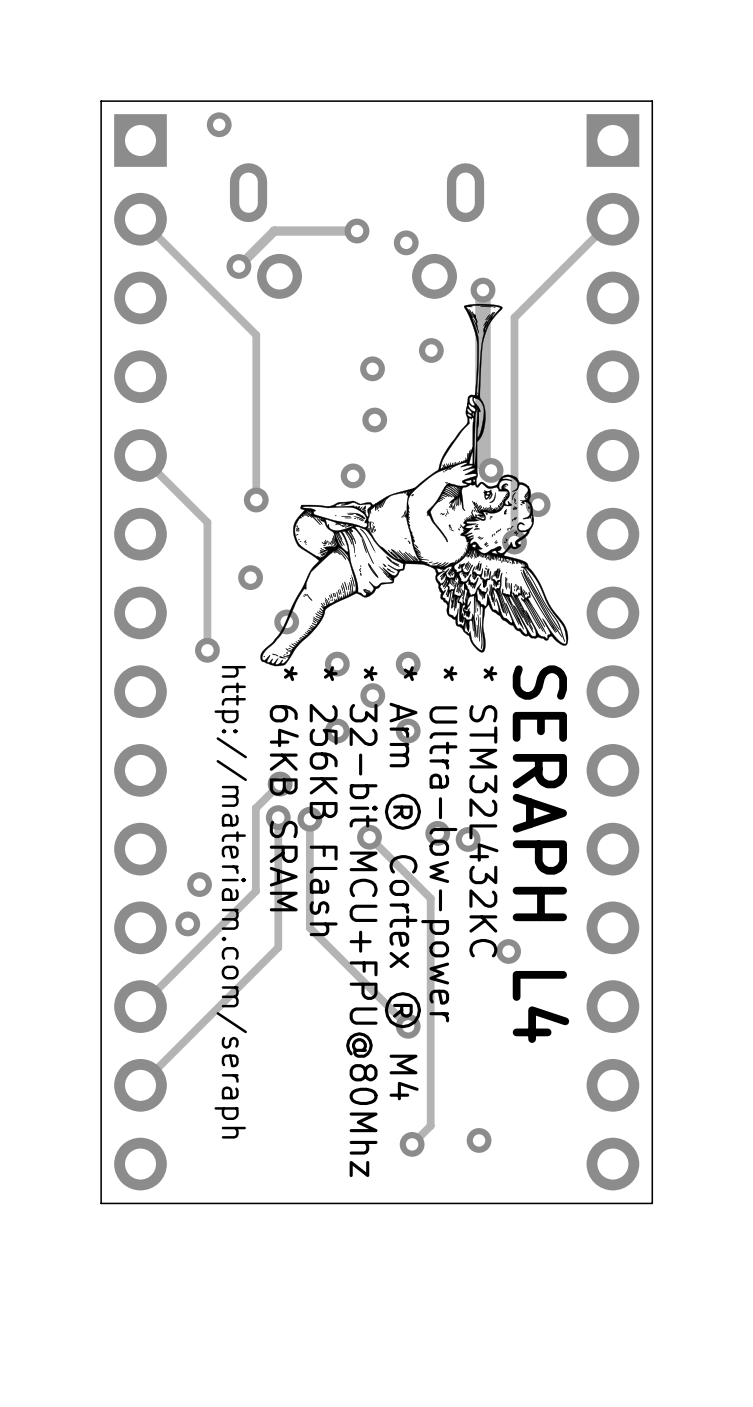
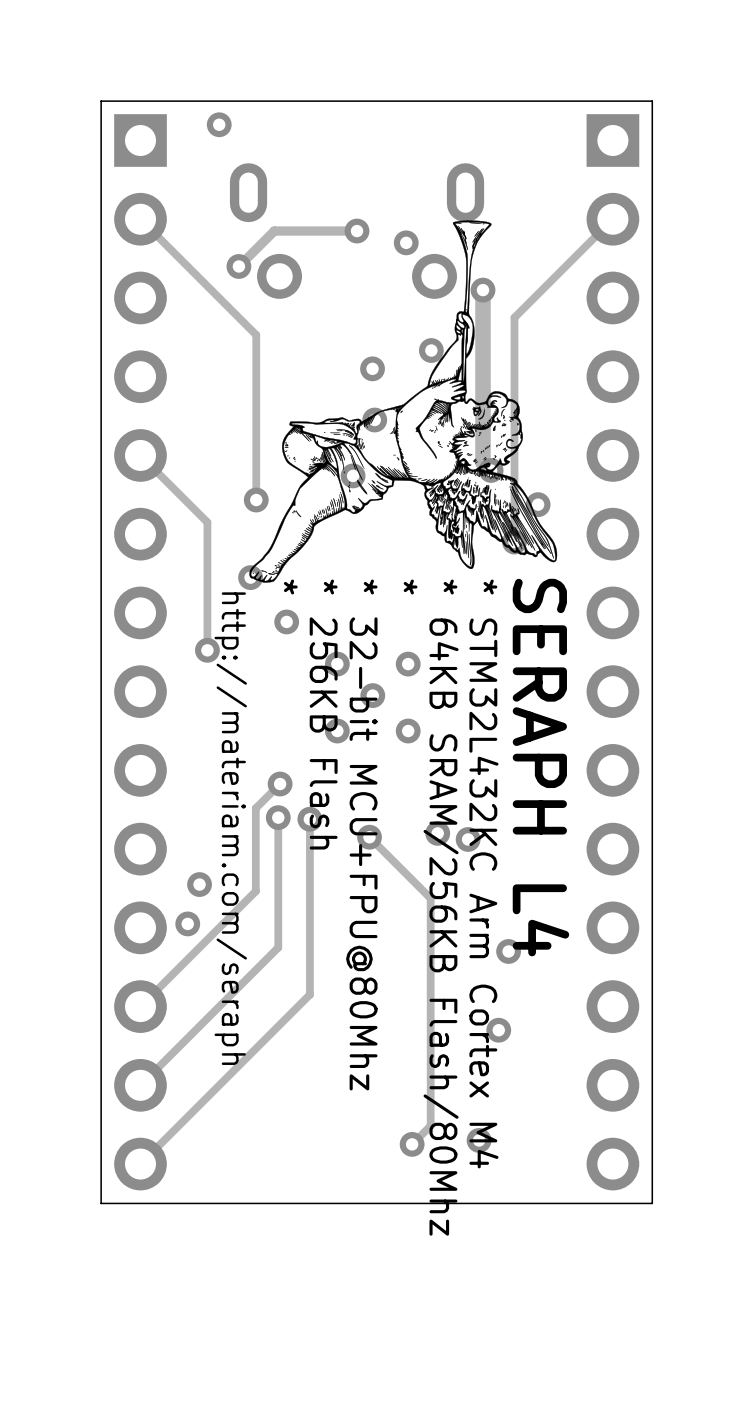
drawing position: (414, 485) -> (403, 401)
text: none -> * (290, 587)
text: none -> * (410, 587)
text: * 64KB SRAM (284, 788) -> none
text position: * 256KB Flash (323, 801) -> * 256KB Flash (323, 714)
text: * STM32L432KC (483, 811) -> * STM32L432KC Arm Cortex M4 (483, 873)
text: * Ultra-low-power (439, 844) -> none
text position: SERAPH L4 (540, 854) -> SERAPH L4 (540, 767)
text: * Arm ® Cortex ® M4 (402, 883) -> none
text position: http://materiam.com/seraph (230, 902) -> http://materiam.com/seraph (230, 828)
text: none -> * 64KB SRAM/256KB Flash/80Mhz (441, 907)
text position: * 32-bit MCU+FPU@80Mhz (361, 921) -> * 32-bit MCU+FPU@80Mhz (361, 834)
track: (309, 927) (408, 1026) -> (309, 927) (309, 994) (140, 1164)
via position: (408, 1026) -> (498, 1030)

